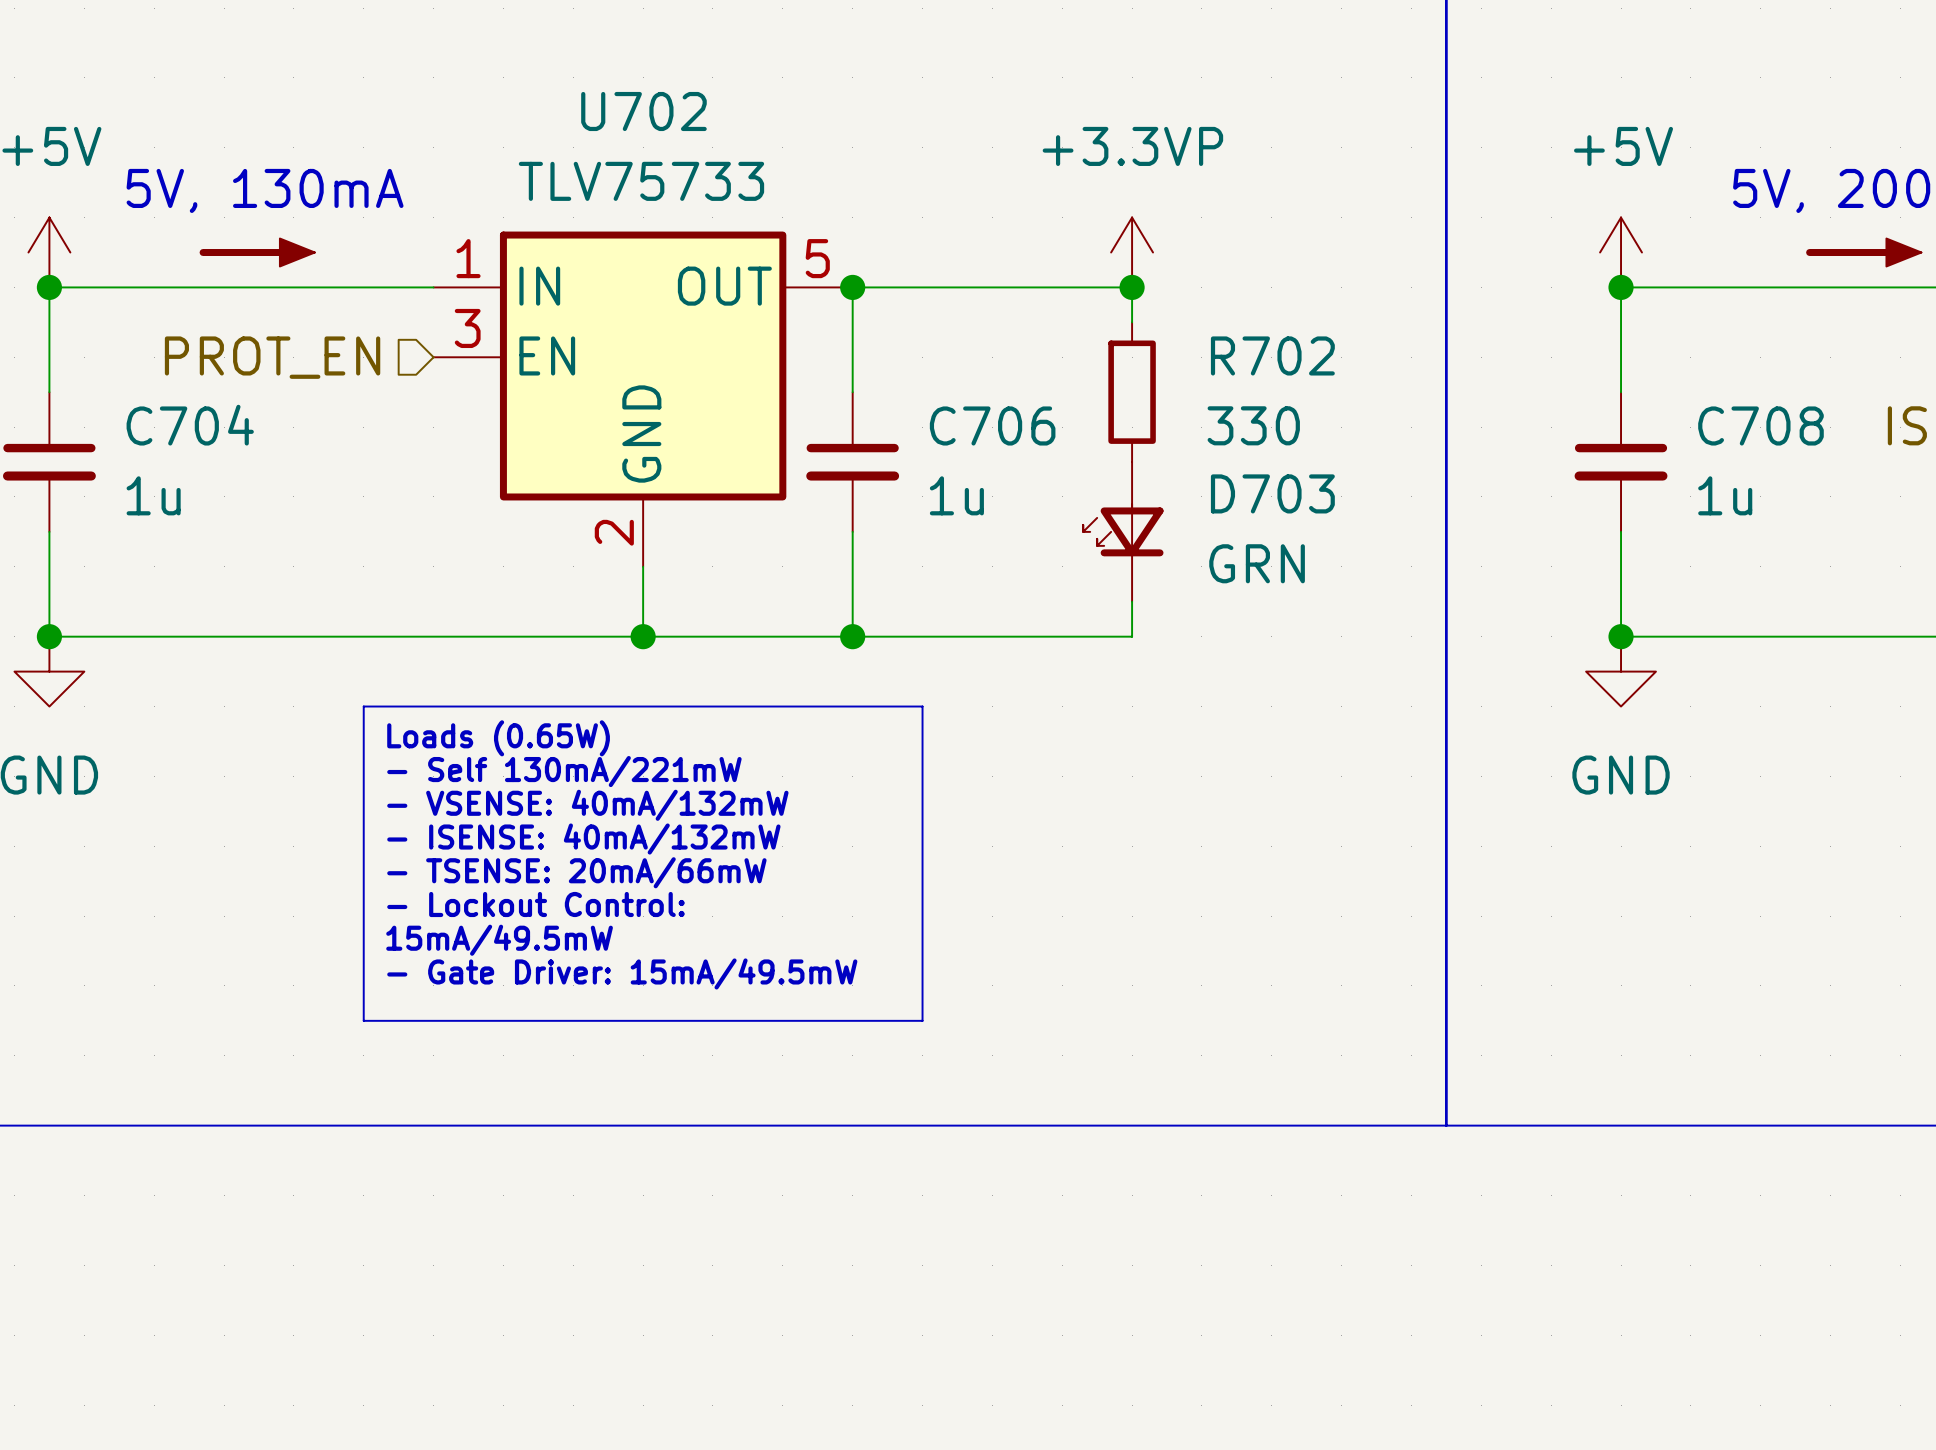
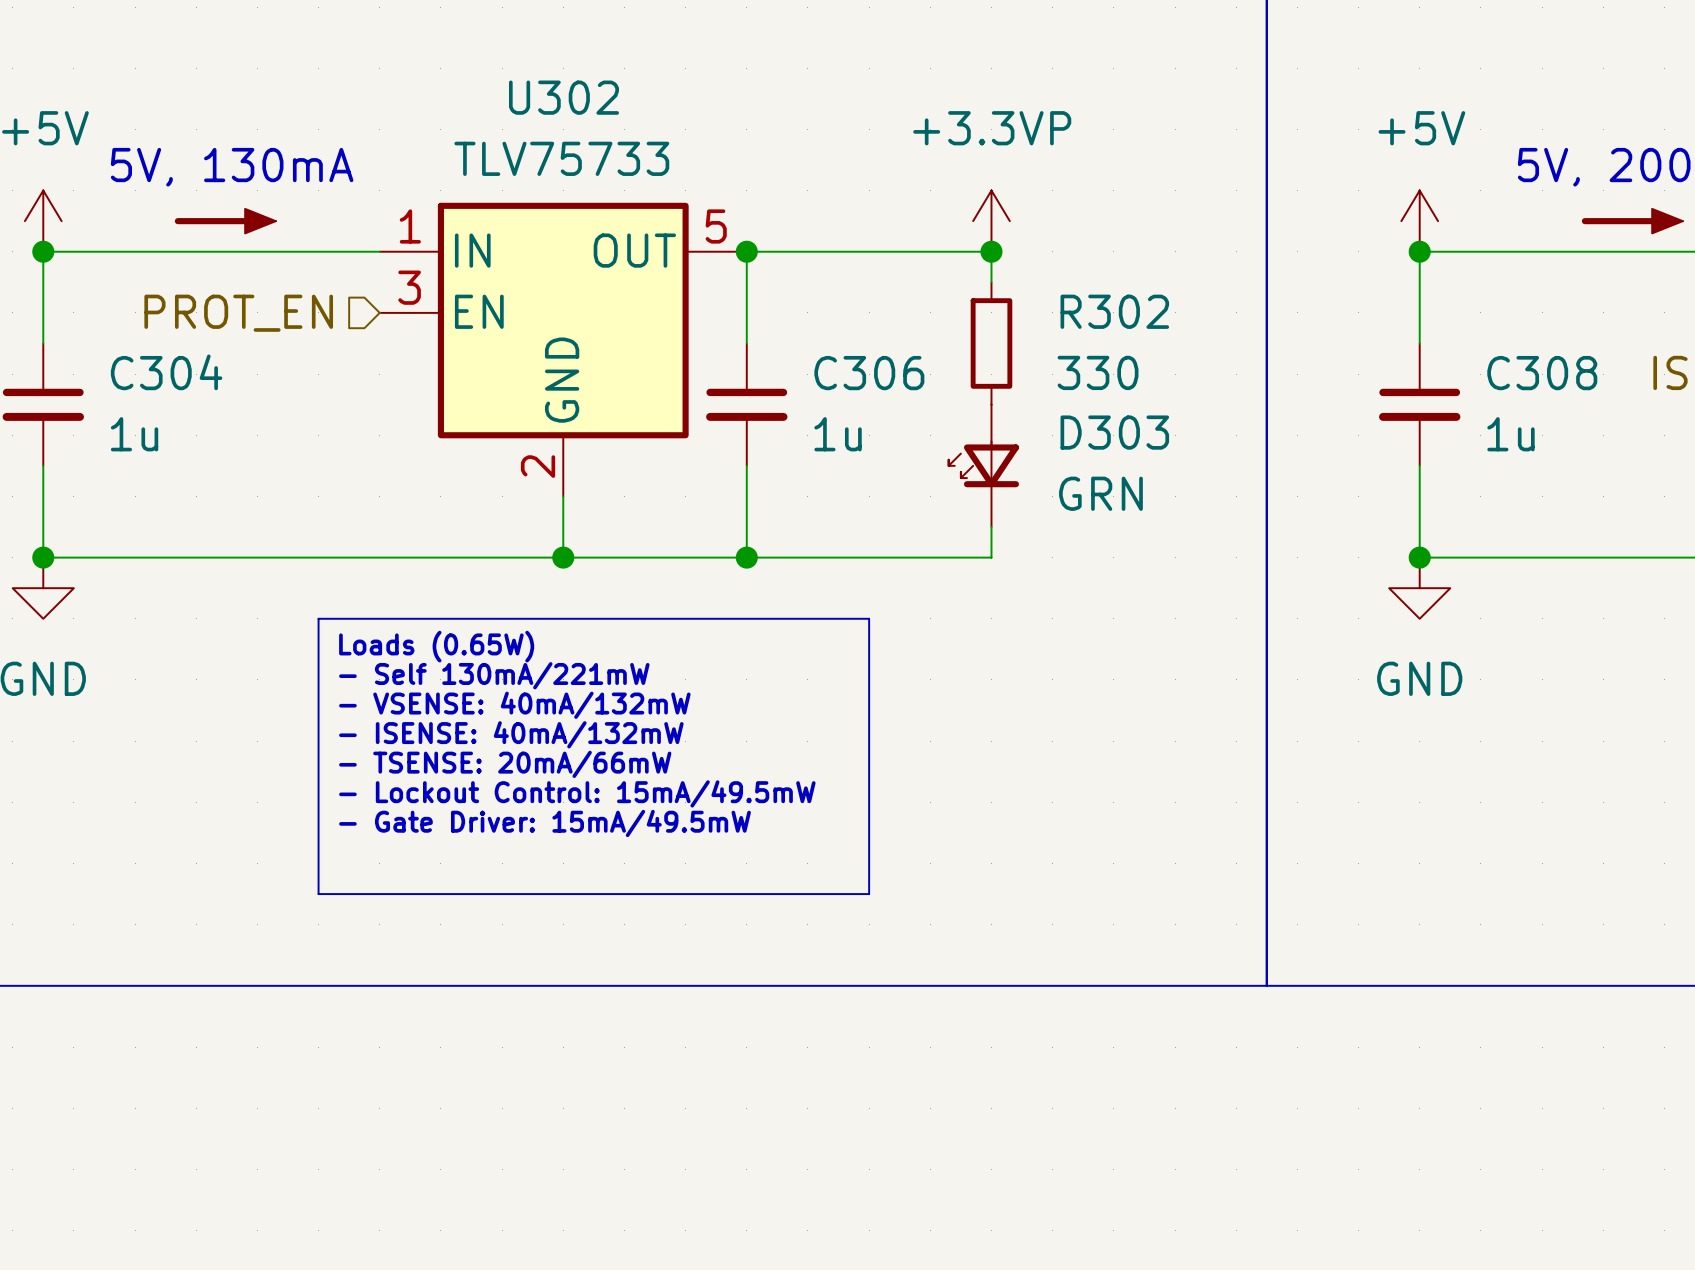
U702 name: U702 (643, 111) -> U302 (563, 97)
R702 name: R702 (1272, 355) -> R302 (1114, 311)
C704 name: C704 (190, 425) -> C304 (166, 372)
C706 name: C706 (992, 425) -> C306 (869, 373)
C708 name: C708 (1760, 425) -> C308 (1542, 373)
D703 name: D703 (1272, 493) -> D303 (1114, 432)
line: (922, 706) (922, 1020) -> (807, 618) (869, 618) (869, 894) (807, 894)
text: - Lockout Control: (535, 904) -> - Lockout Control: 15mA/49.5mW (577, 793)
text: 15mA/49.5mW (499, 940) -> - Gate Driver: 15mA/49.5mW (545, 823)
text: - Gate Driver: 15mA/49.5mW (622, 973) -> none

